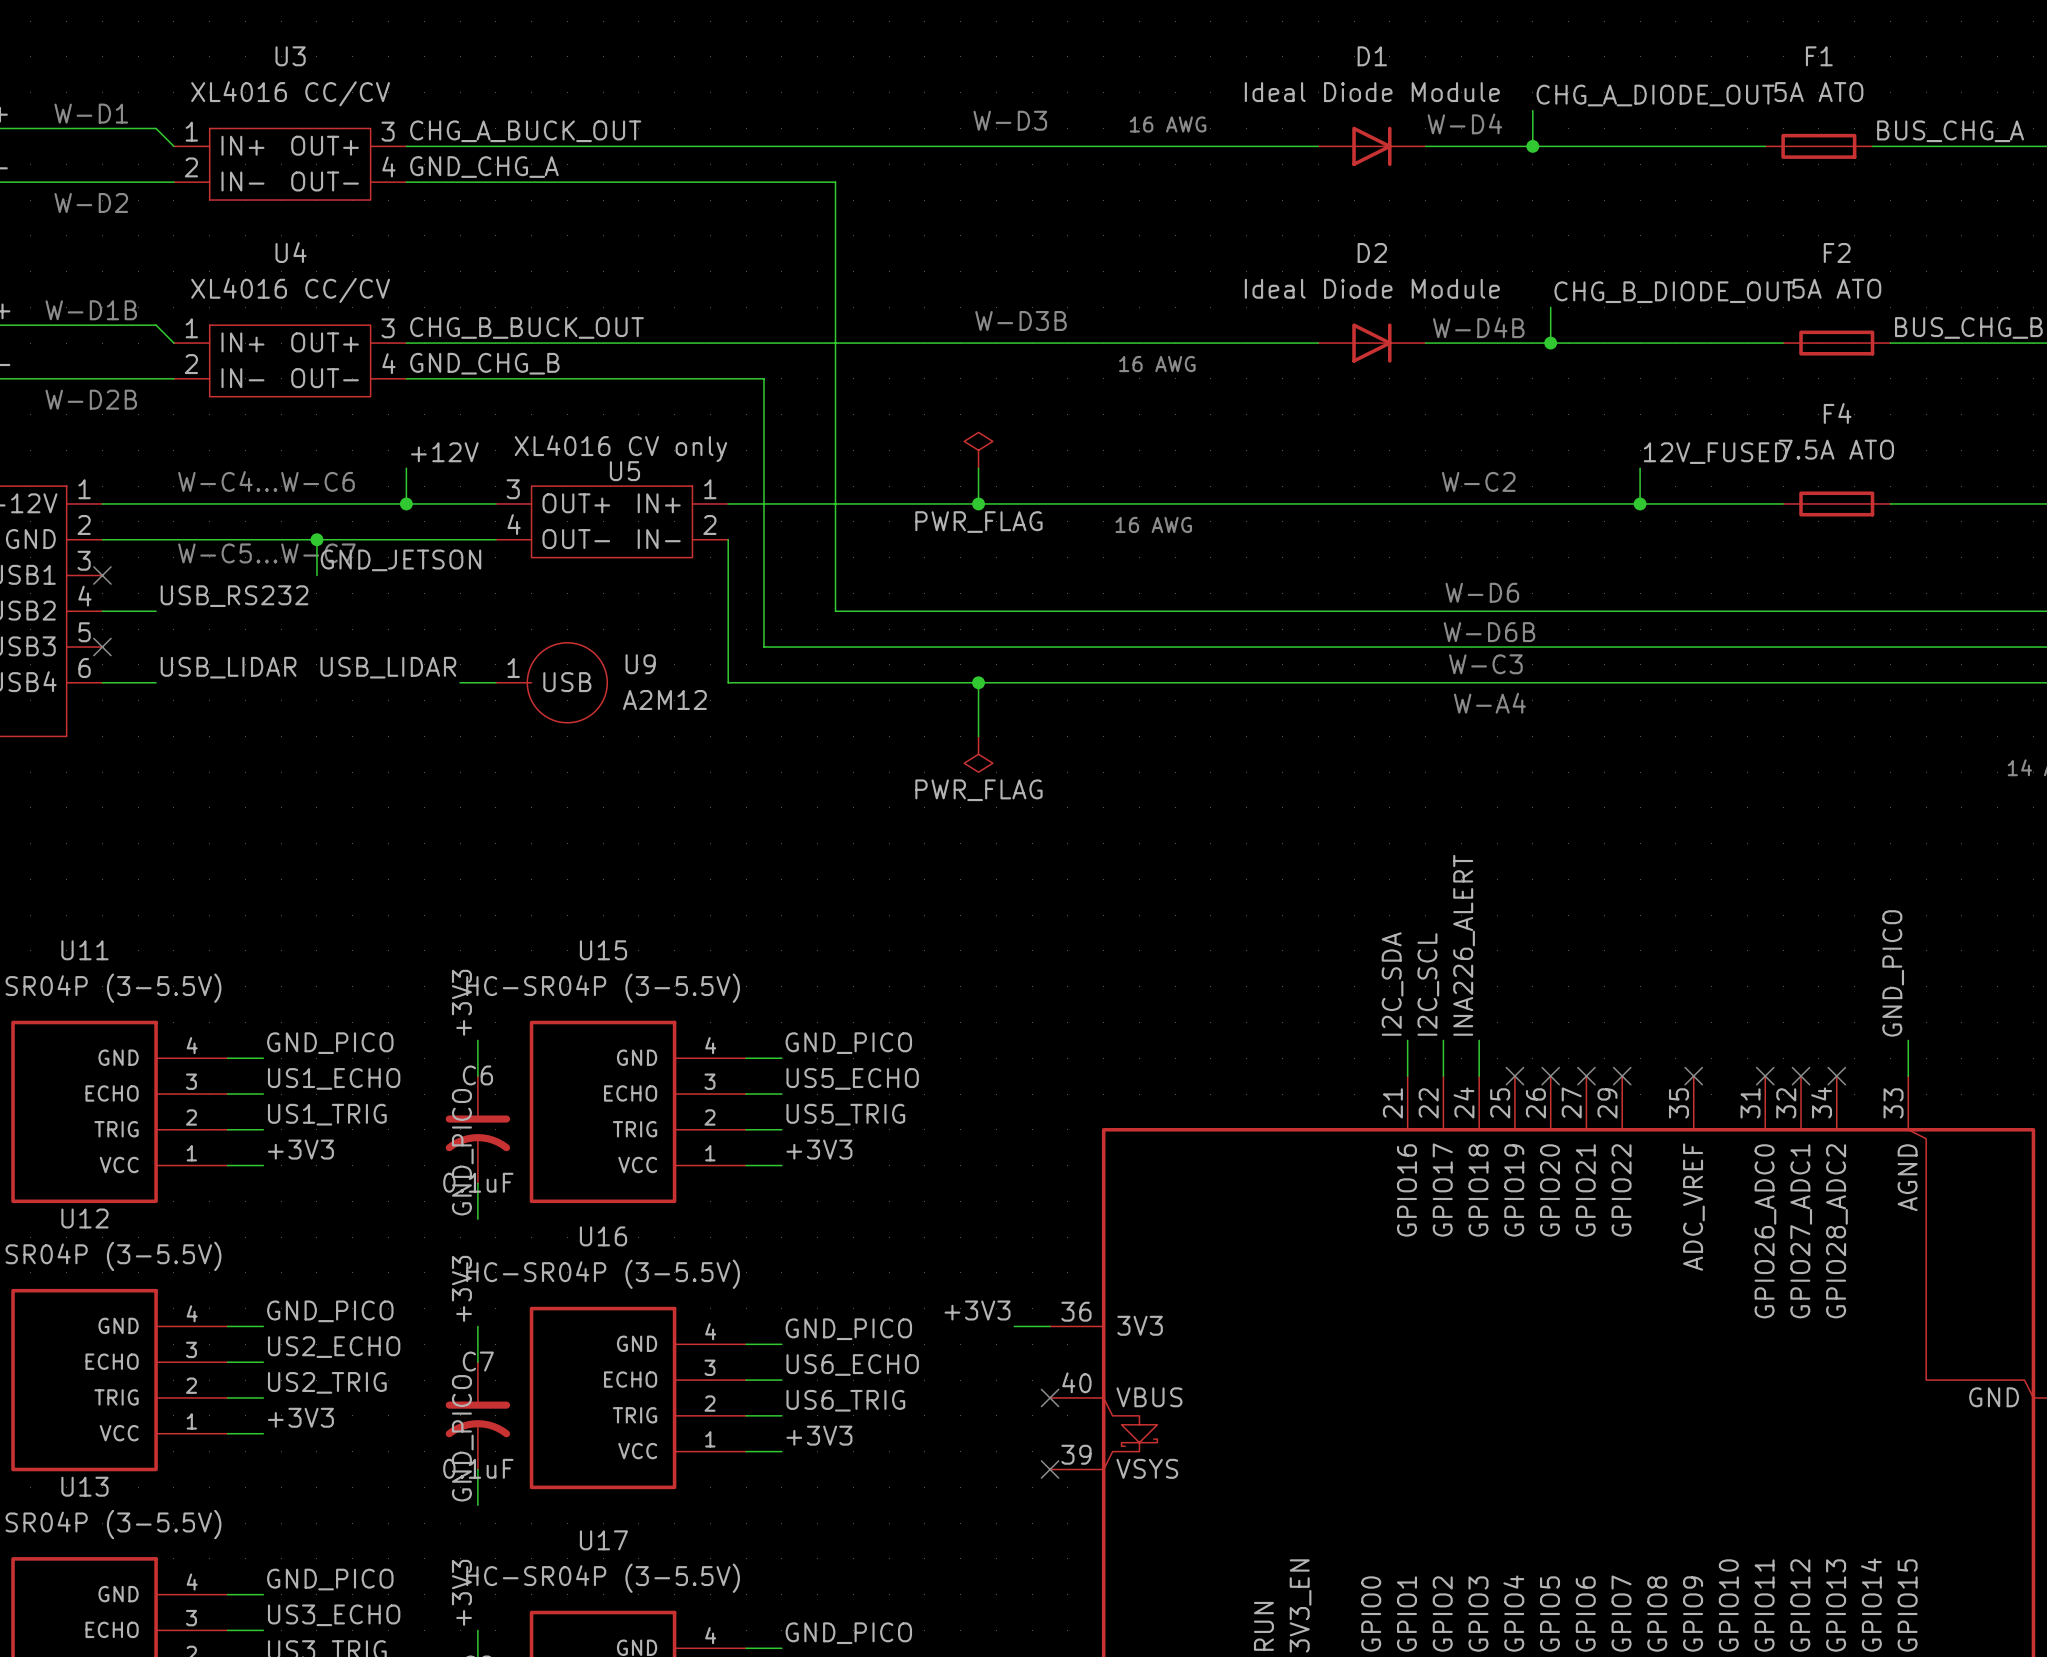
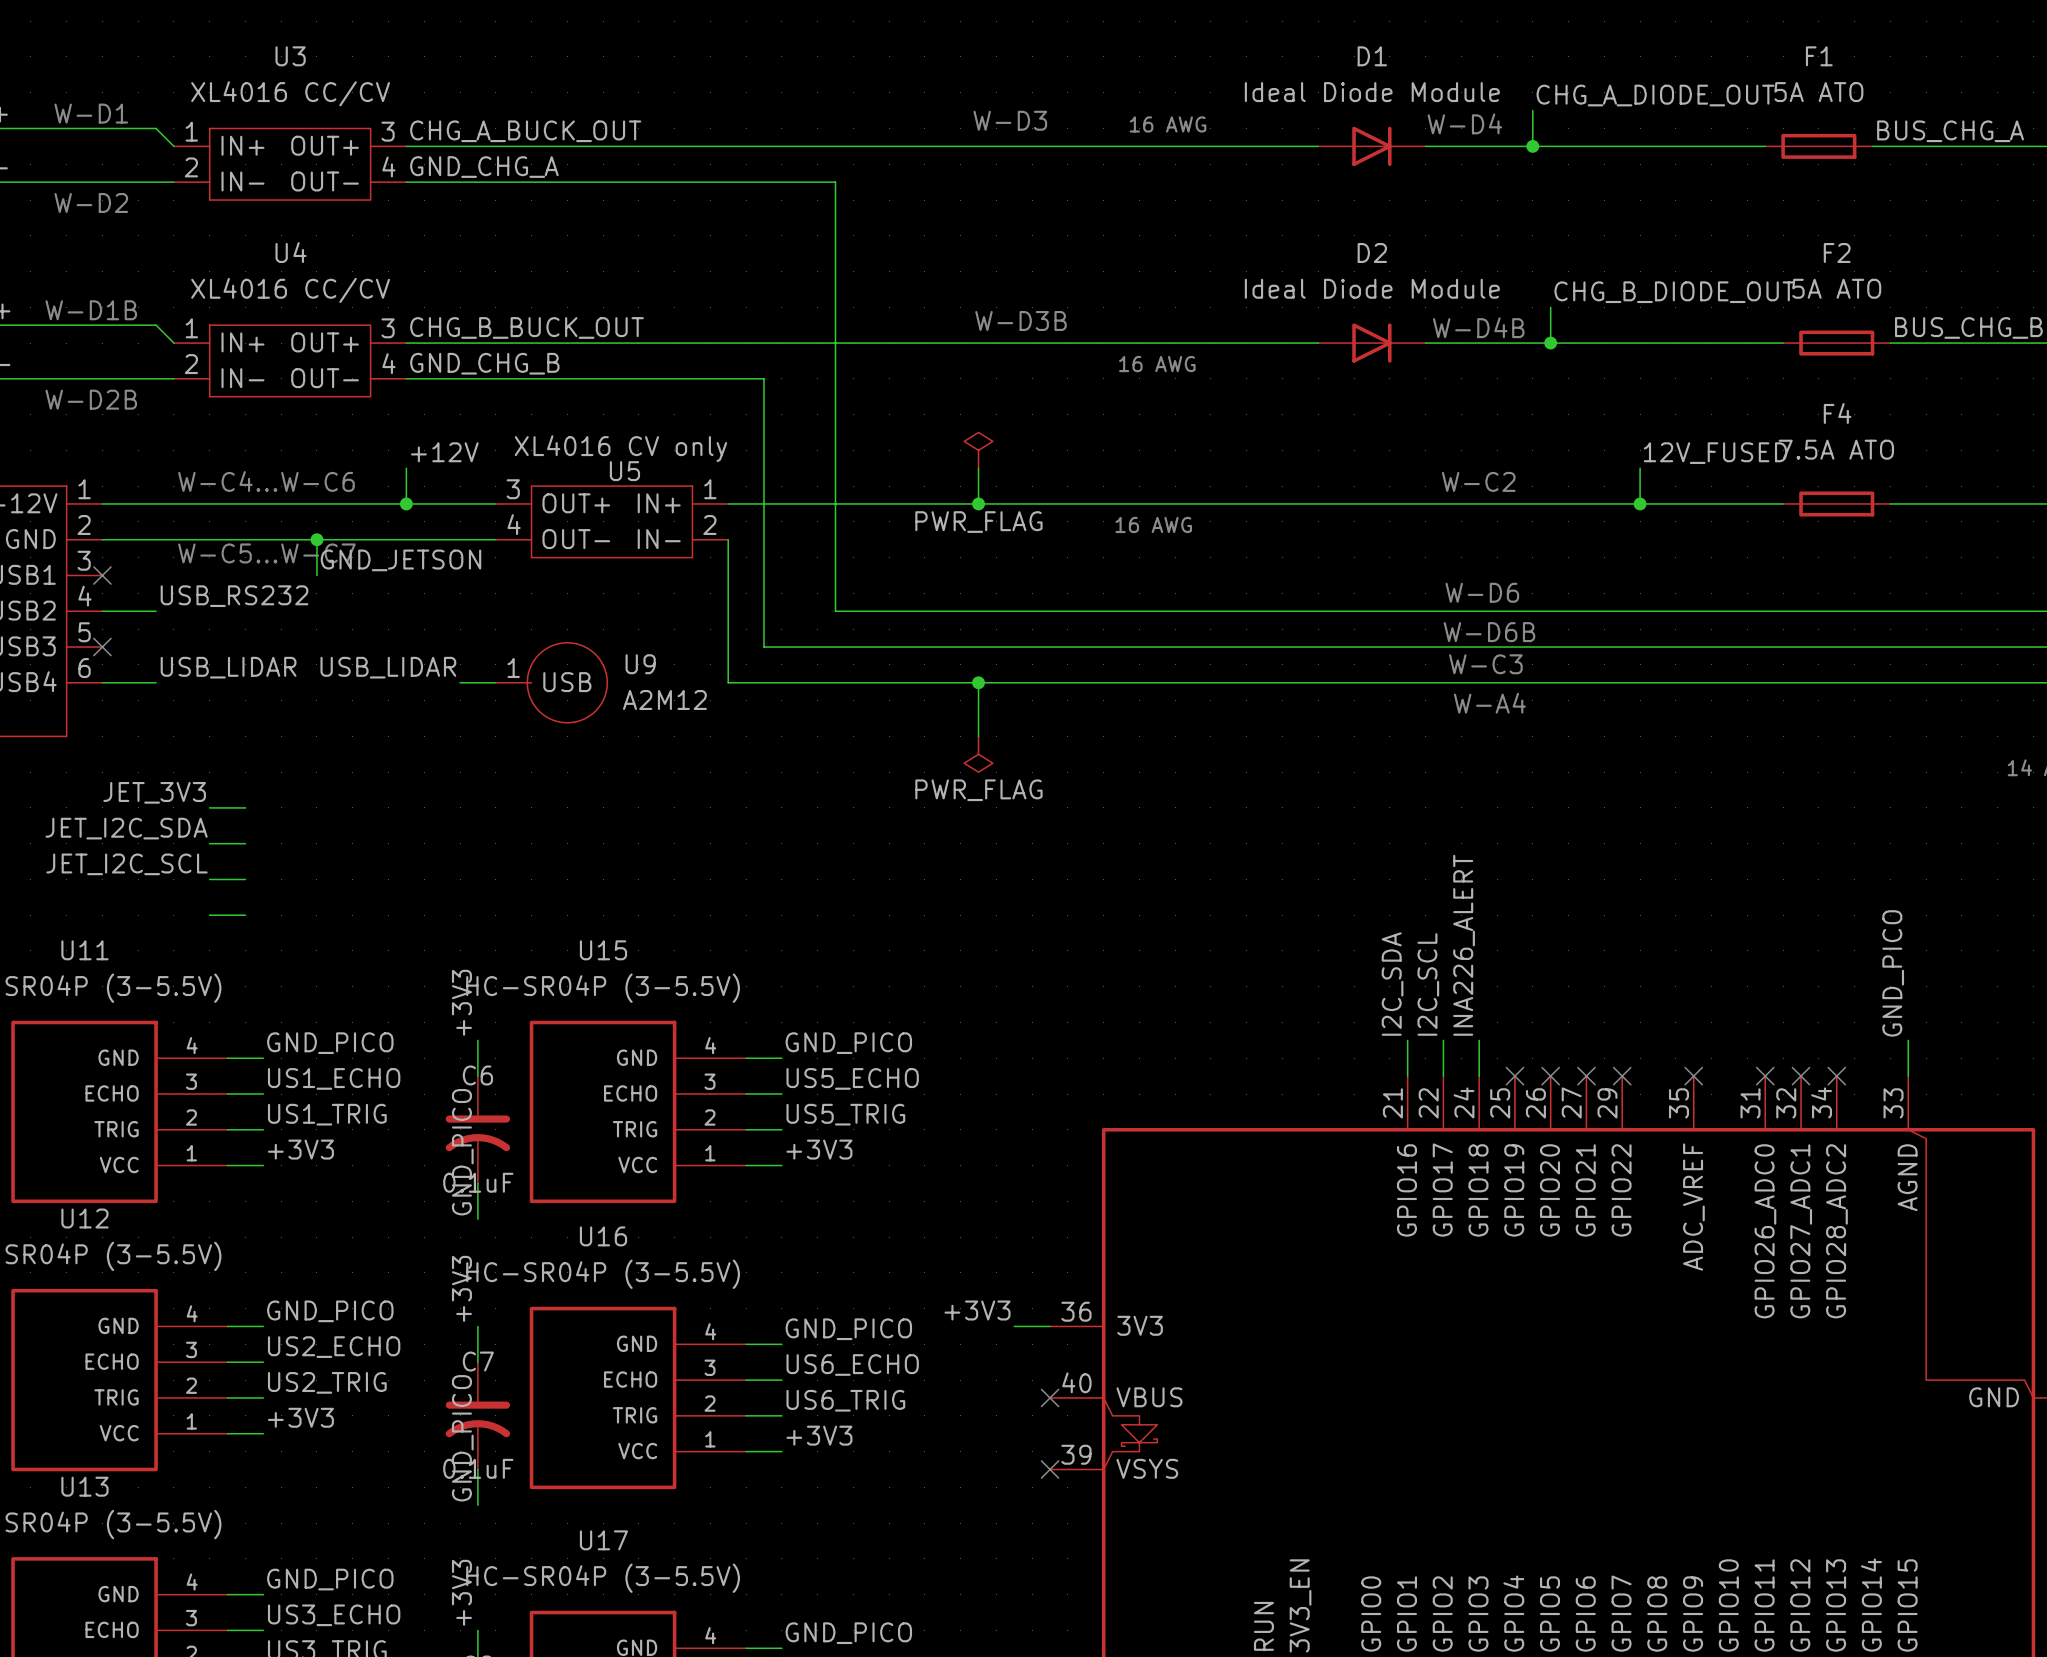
label: none -> JET_3V3 (154, 792)
wire: none -> (209, 807) (245, 807)
label: none -> JET_I2C_SDA (126, 828)
wire: none -> (209, 843) (245, 843)
label: none -> JET_I2C_SCL (126, 864)
wire: none -> (209, 879) (245, 879)
wire: none -> (209, 915) (245, 915)

